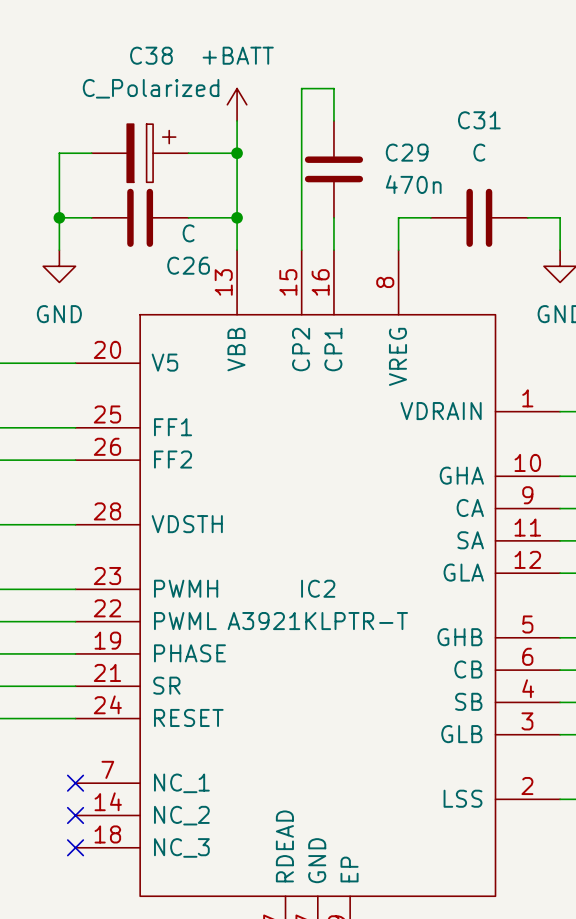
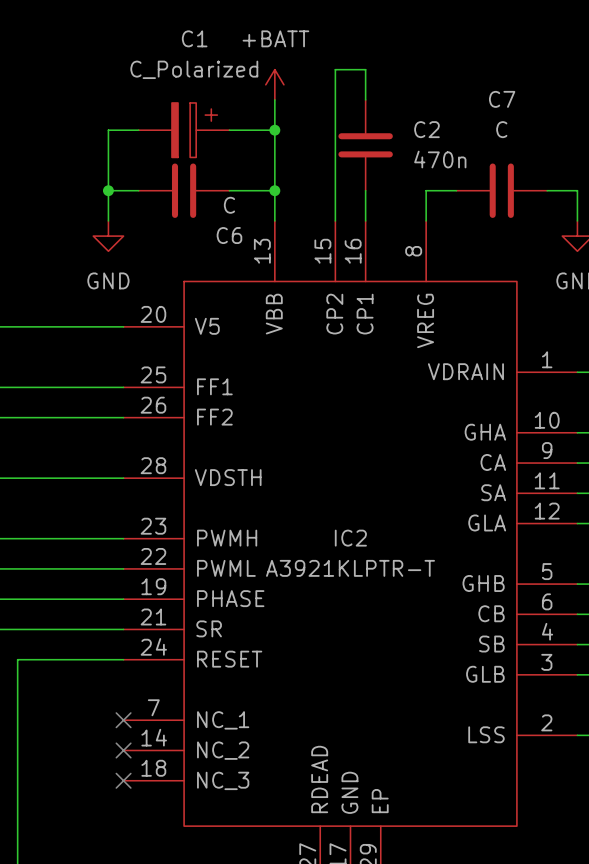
C38 name: C38 (151, 55) -> C1 (194, 38)
C31 name: C31 (479, 120) -> C7 (502, 99)
C29 name: C29 (407, 152) -> C2 (426, 129)
C26 name: C26 (188, 265) -> C6 (229, 235)

